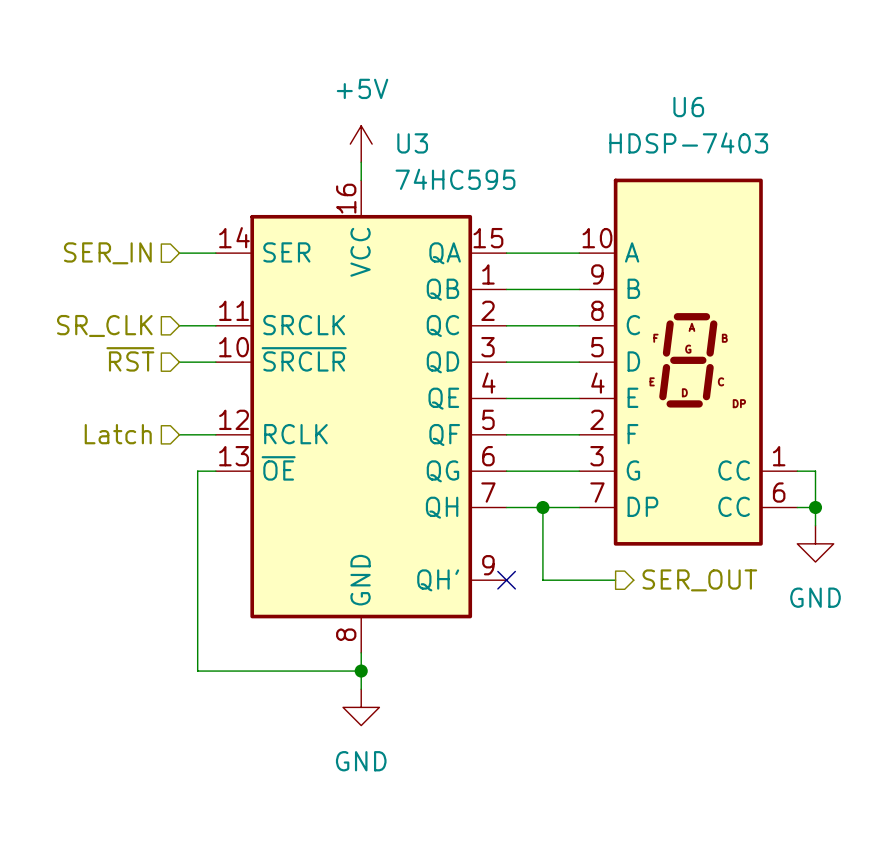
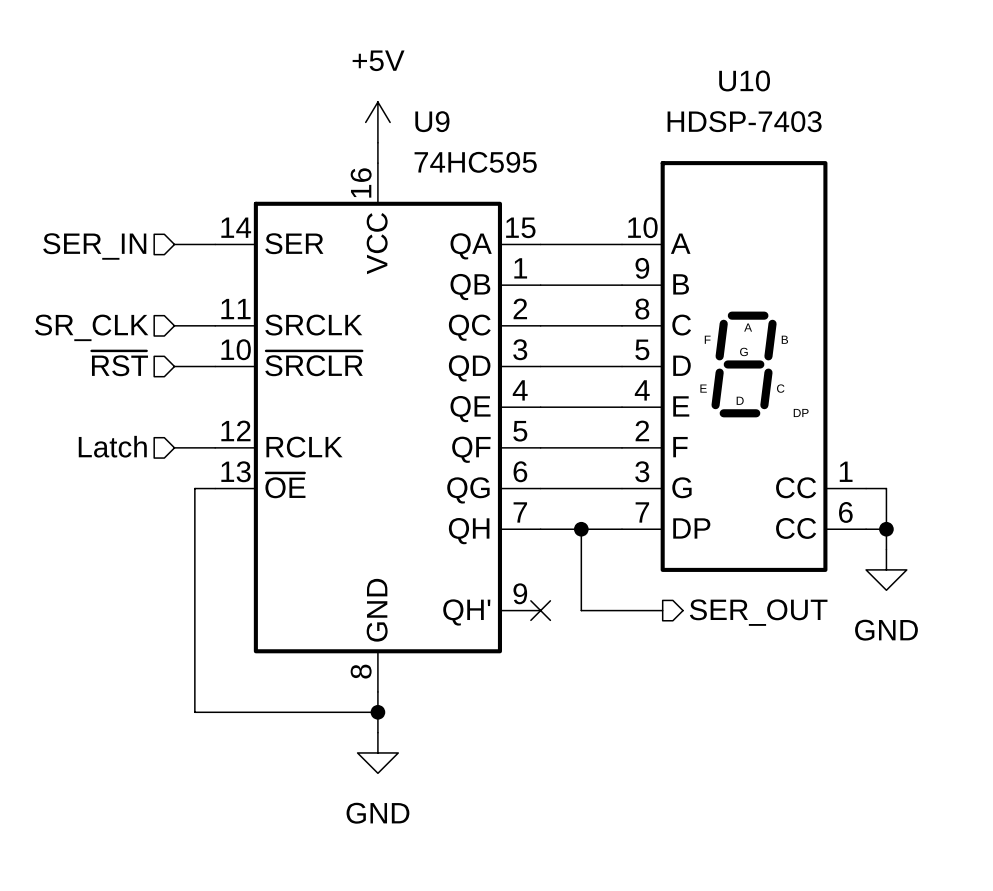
U6 name: U6 (688, 107) -> U10 (744, 80)
U3 name: U3 (412, 143) -> U9 (432, 121)

